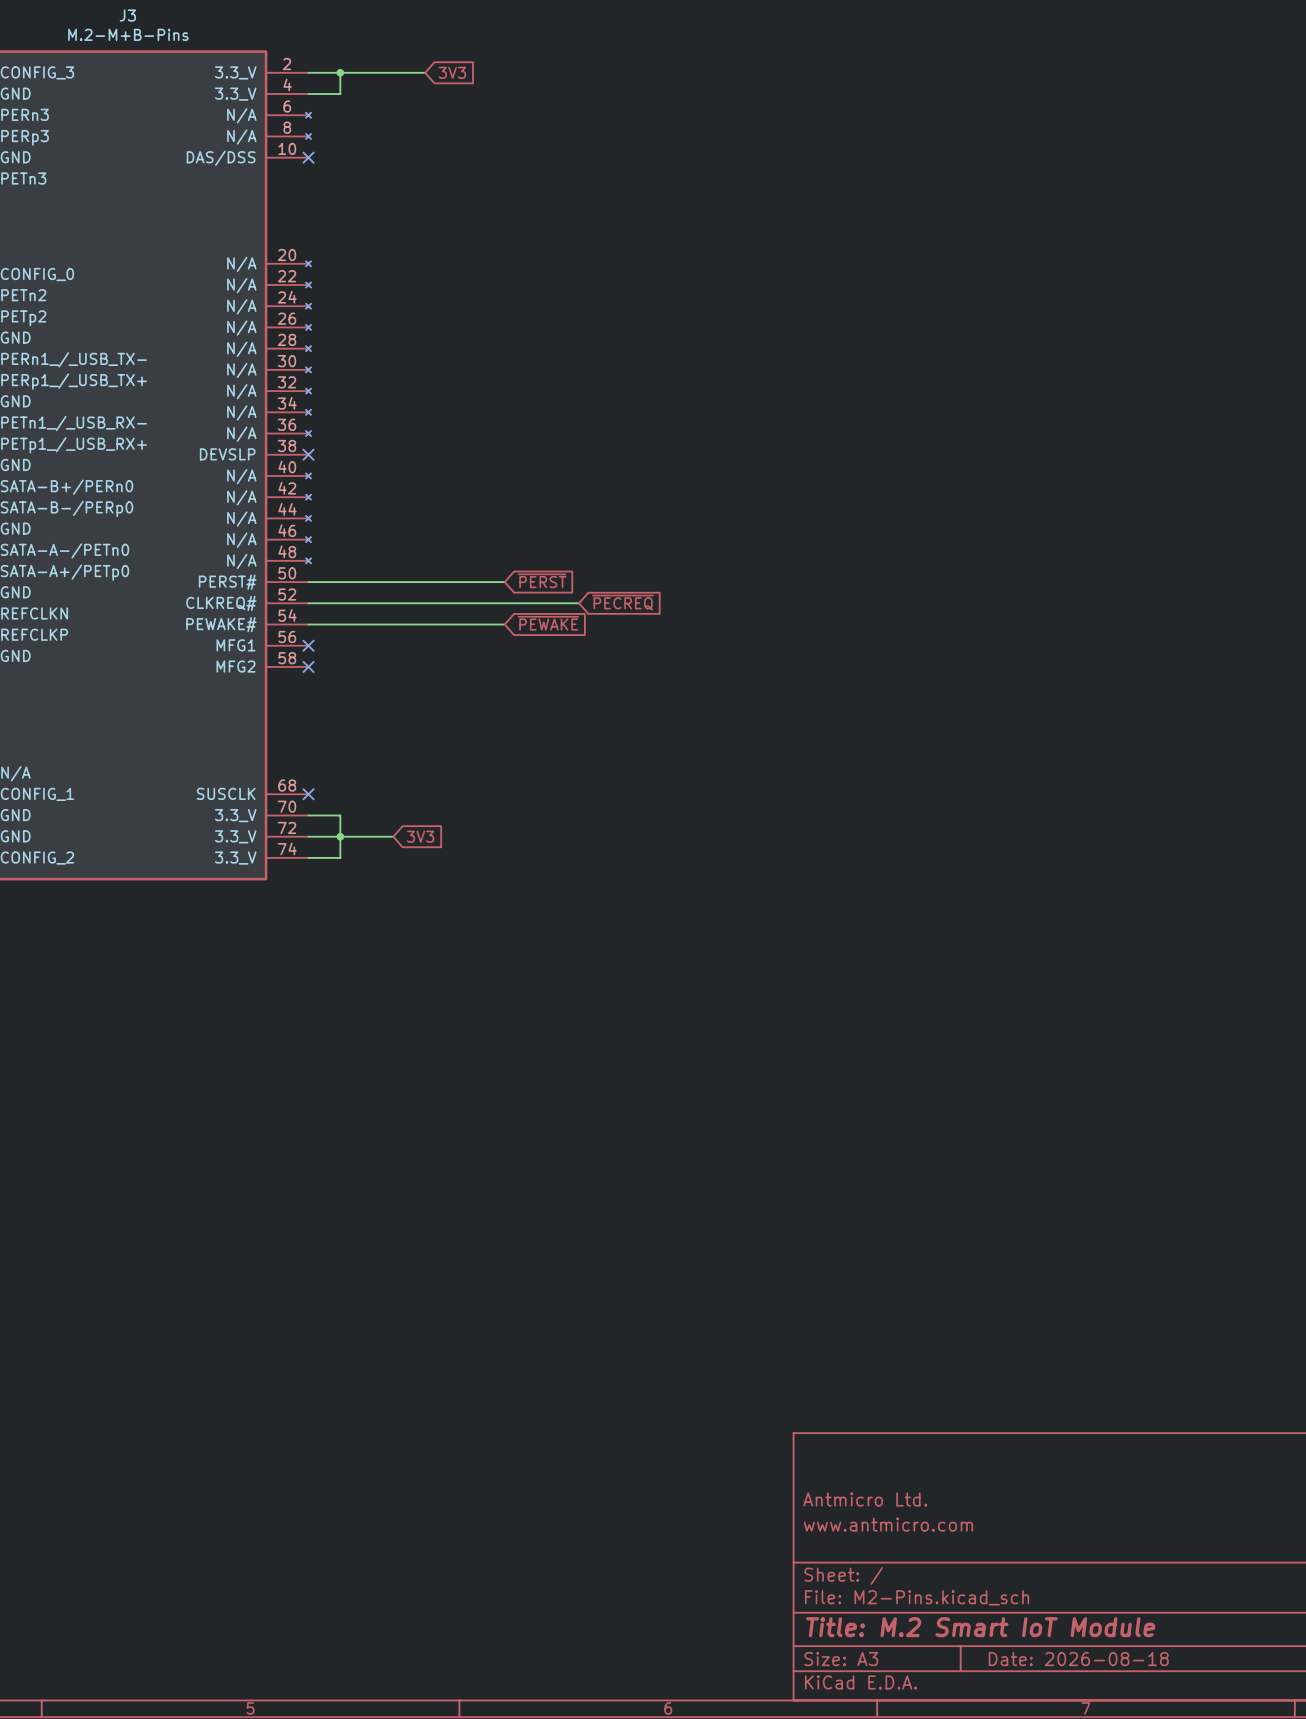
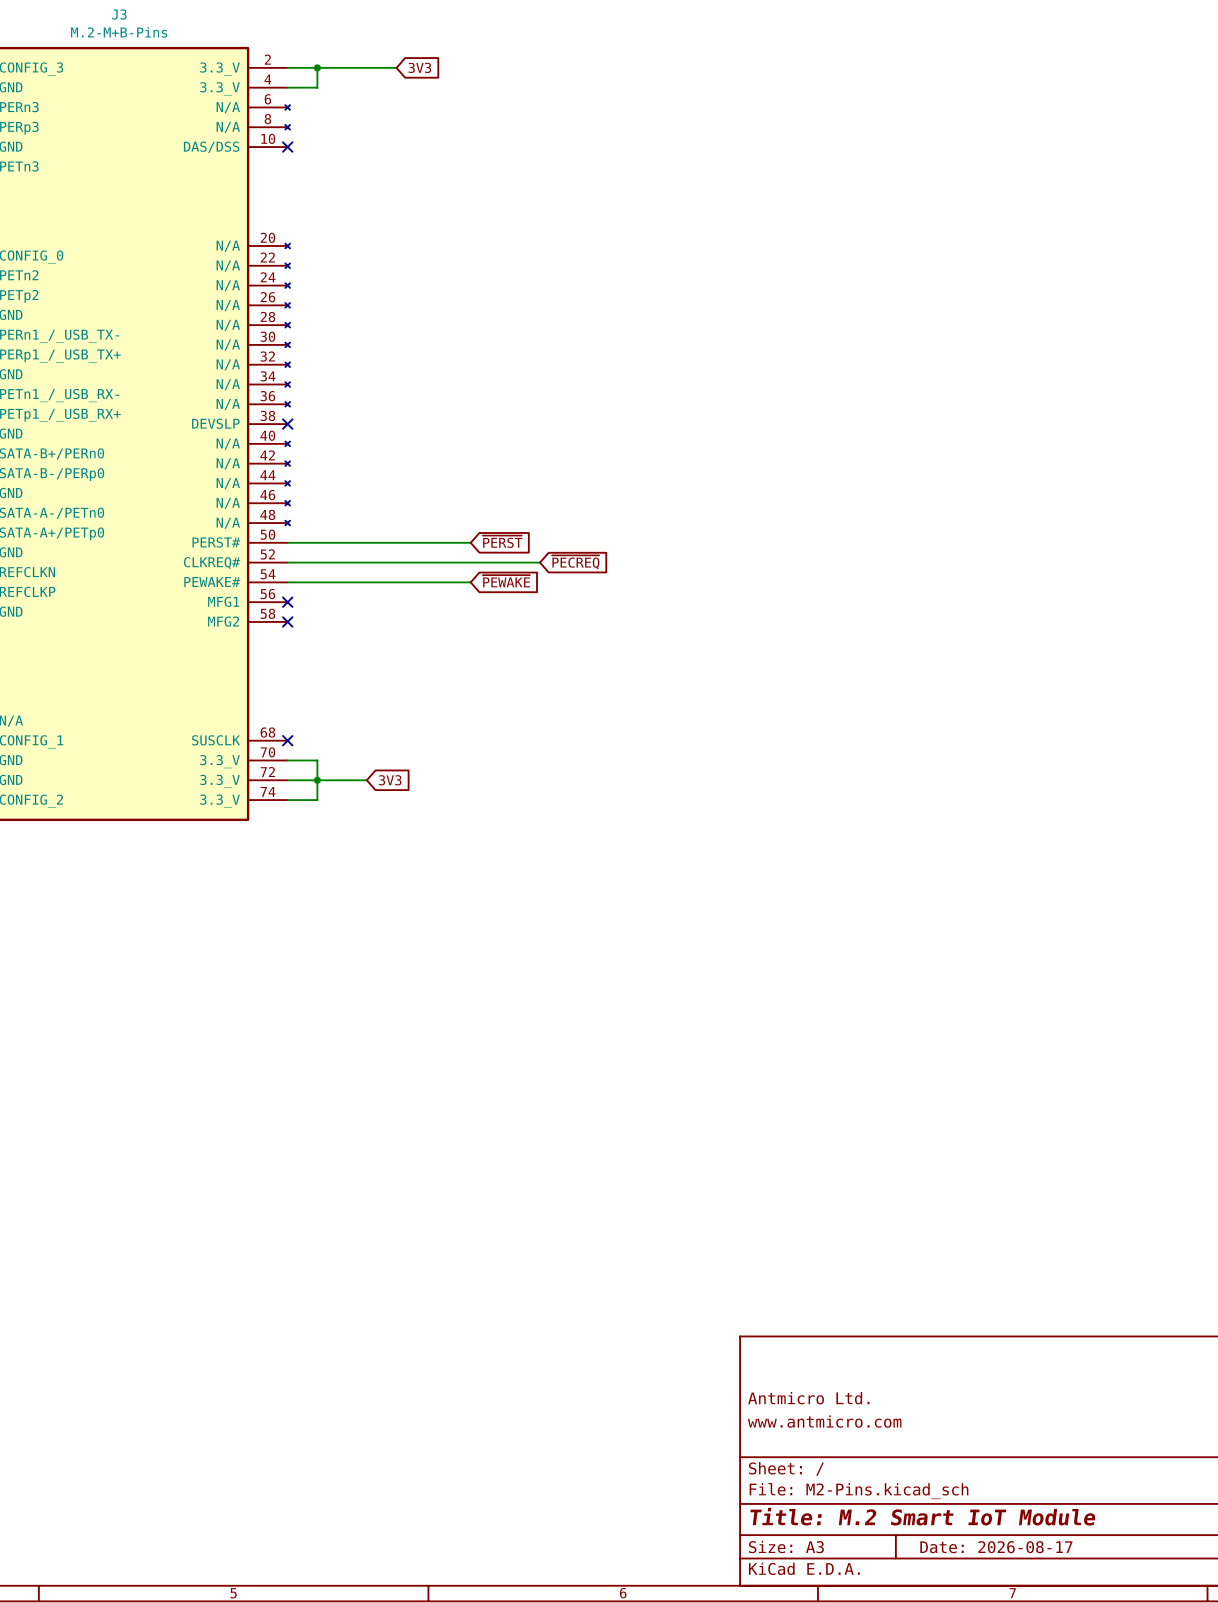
title block: Date: 2026-08-18 (1078, 1659) -> Date: 2026-08-17 (996, 1547)

